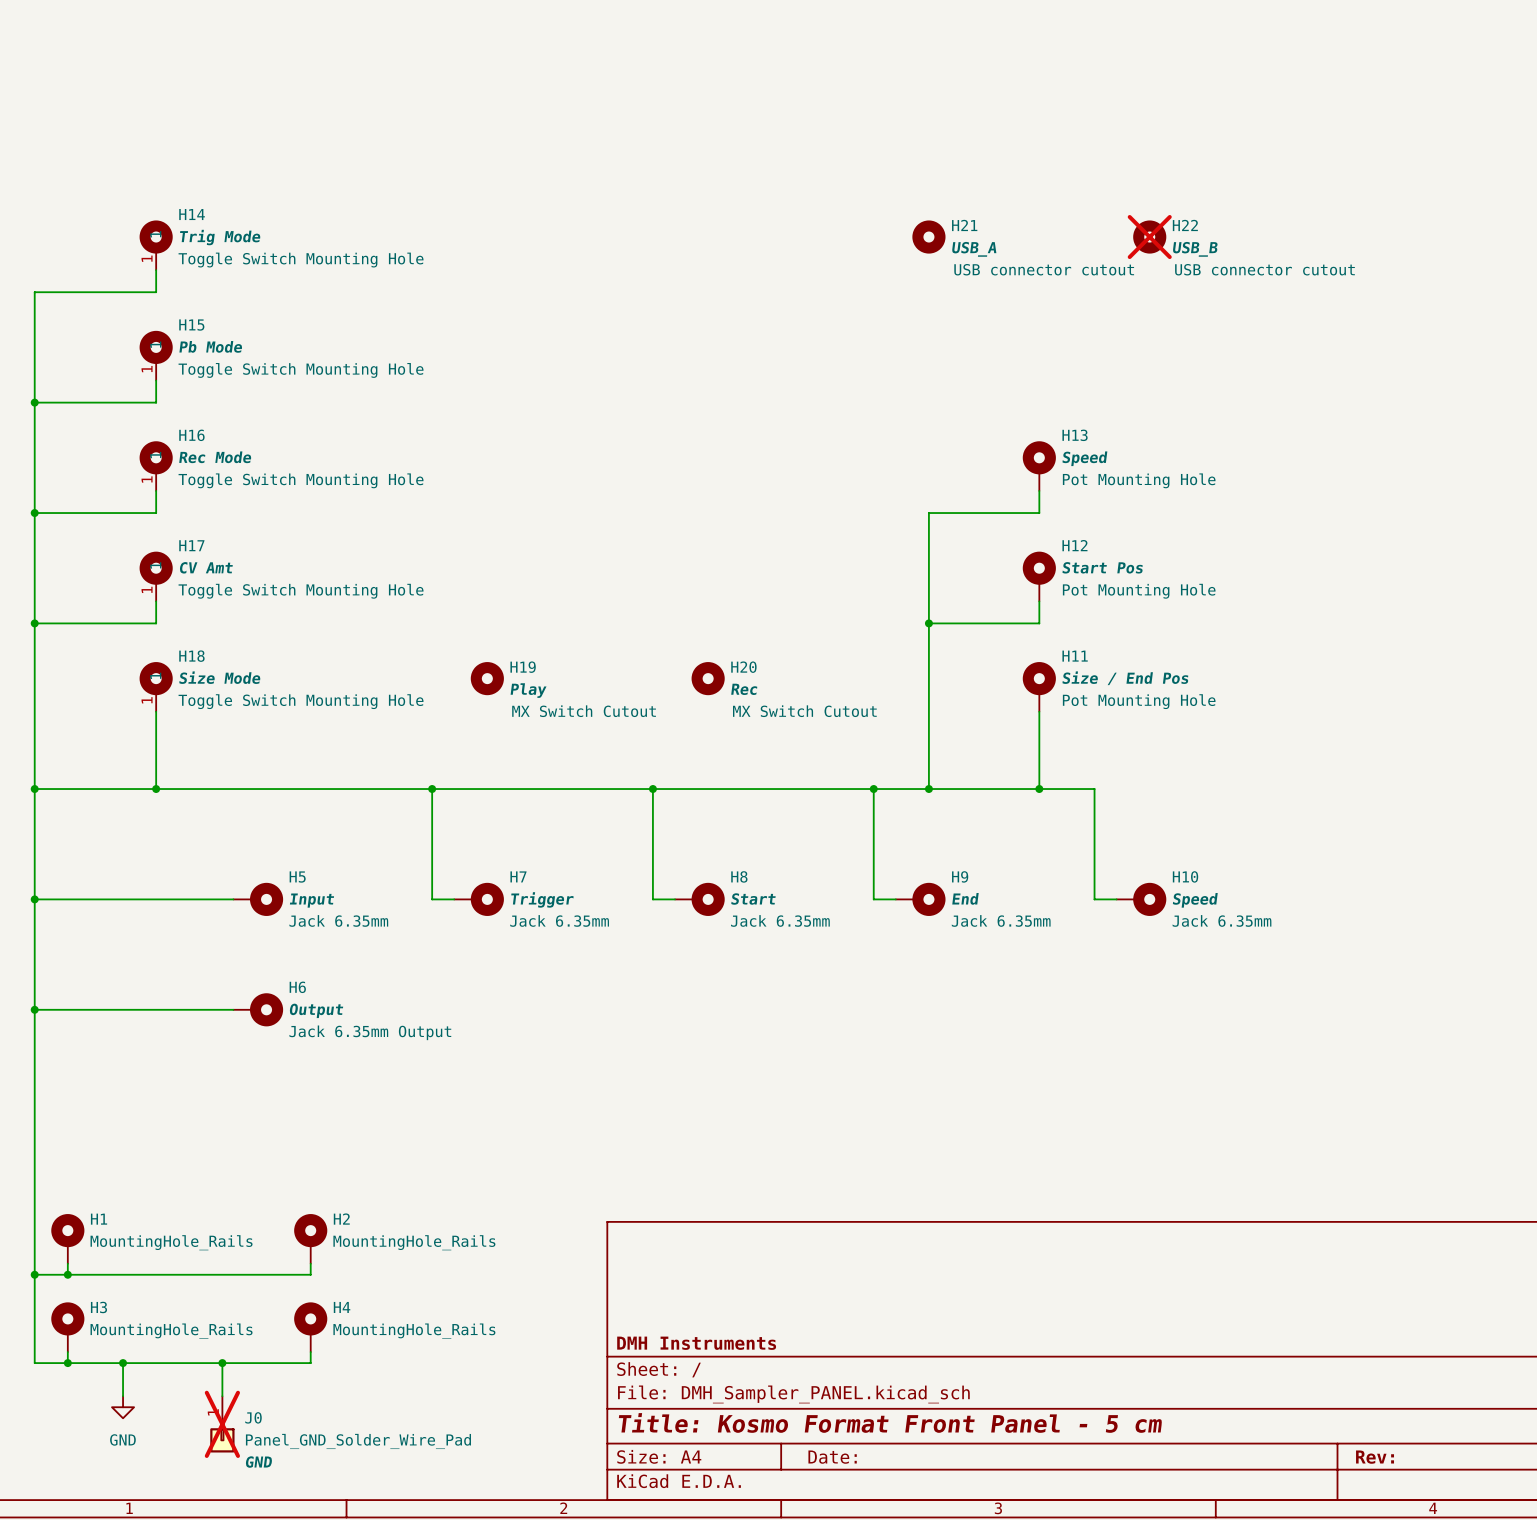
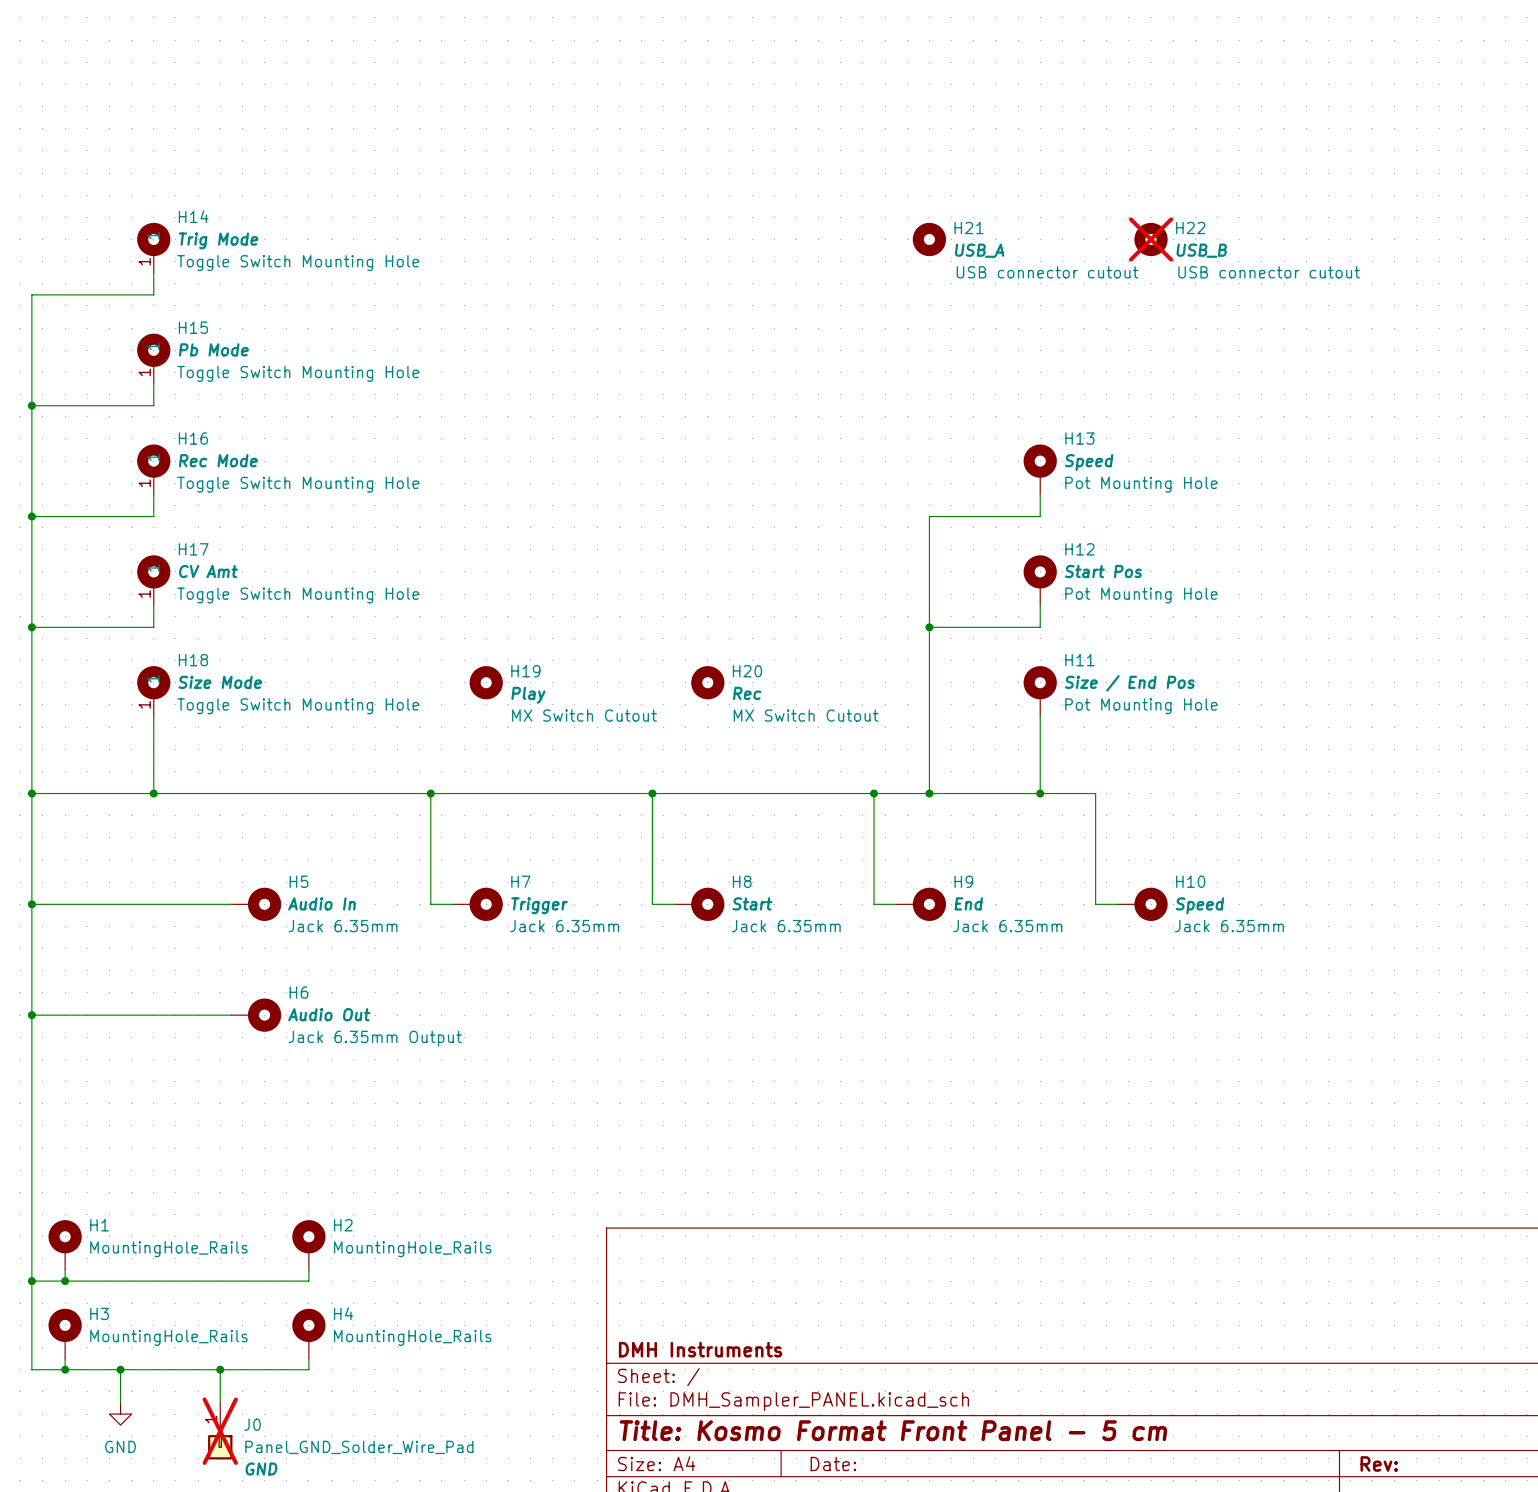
H5 value: Input (311, 900) -> Audio In (322, 903)
H6 value: Output (316, 1010) -> Audio Out (329, 1014)

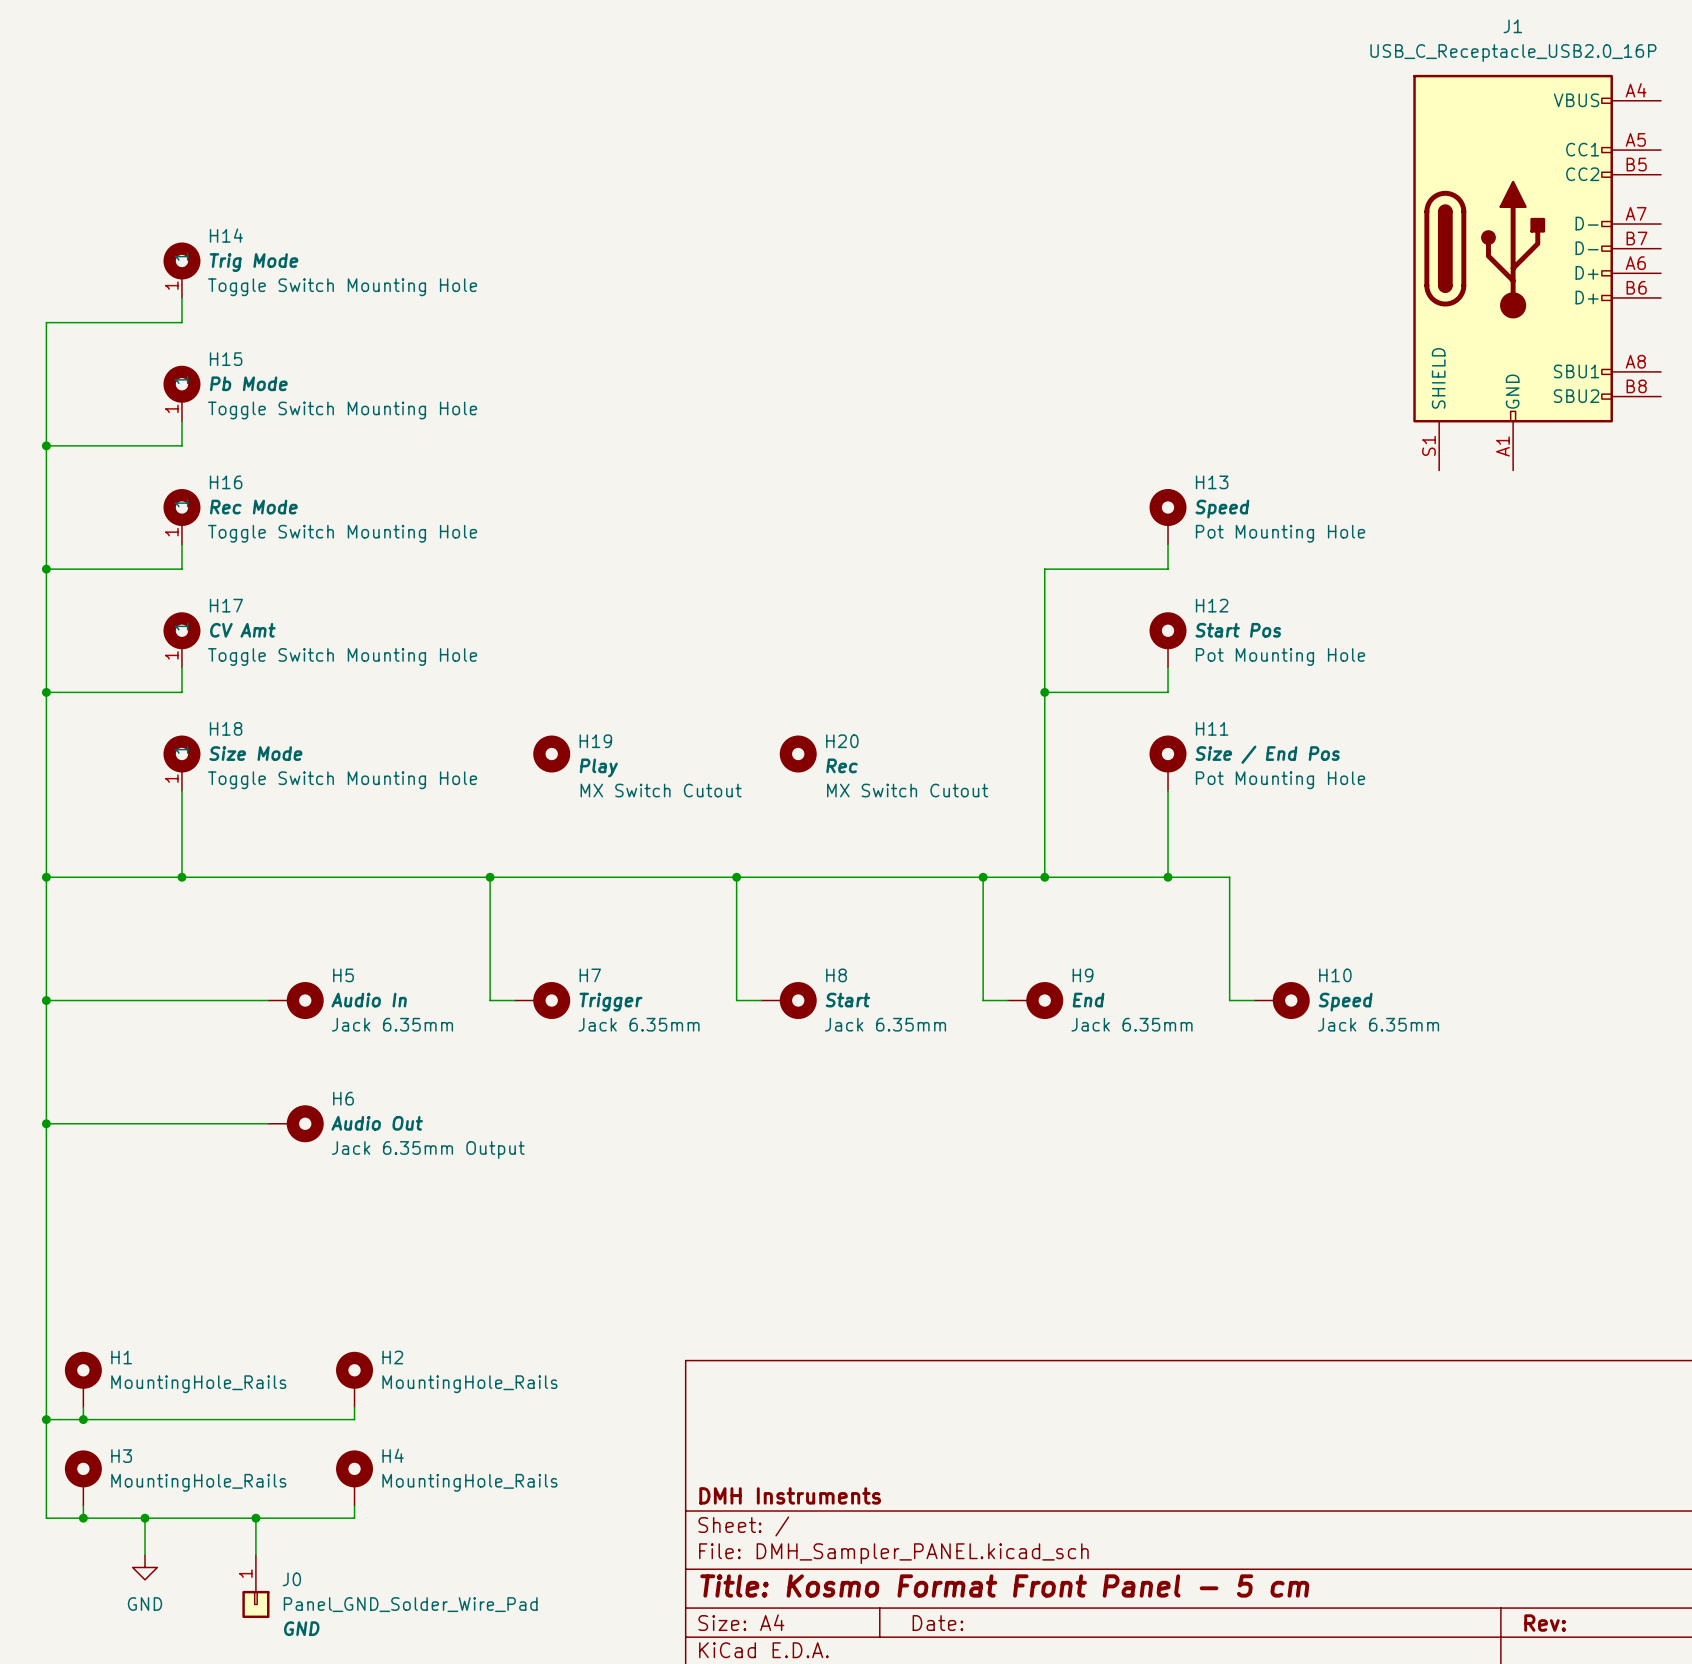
H21: USB_A (929, 239) -> none
H22: USB_B (1151, 239) -> none
J1: none -> USB_C_Receptacle_USB2.0_16P (1537, 272)
J0 do-not-place cross: (220, 1431) -> none

